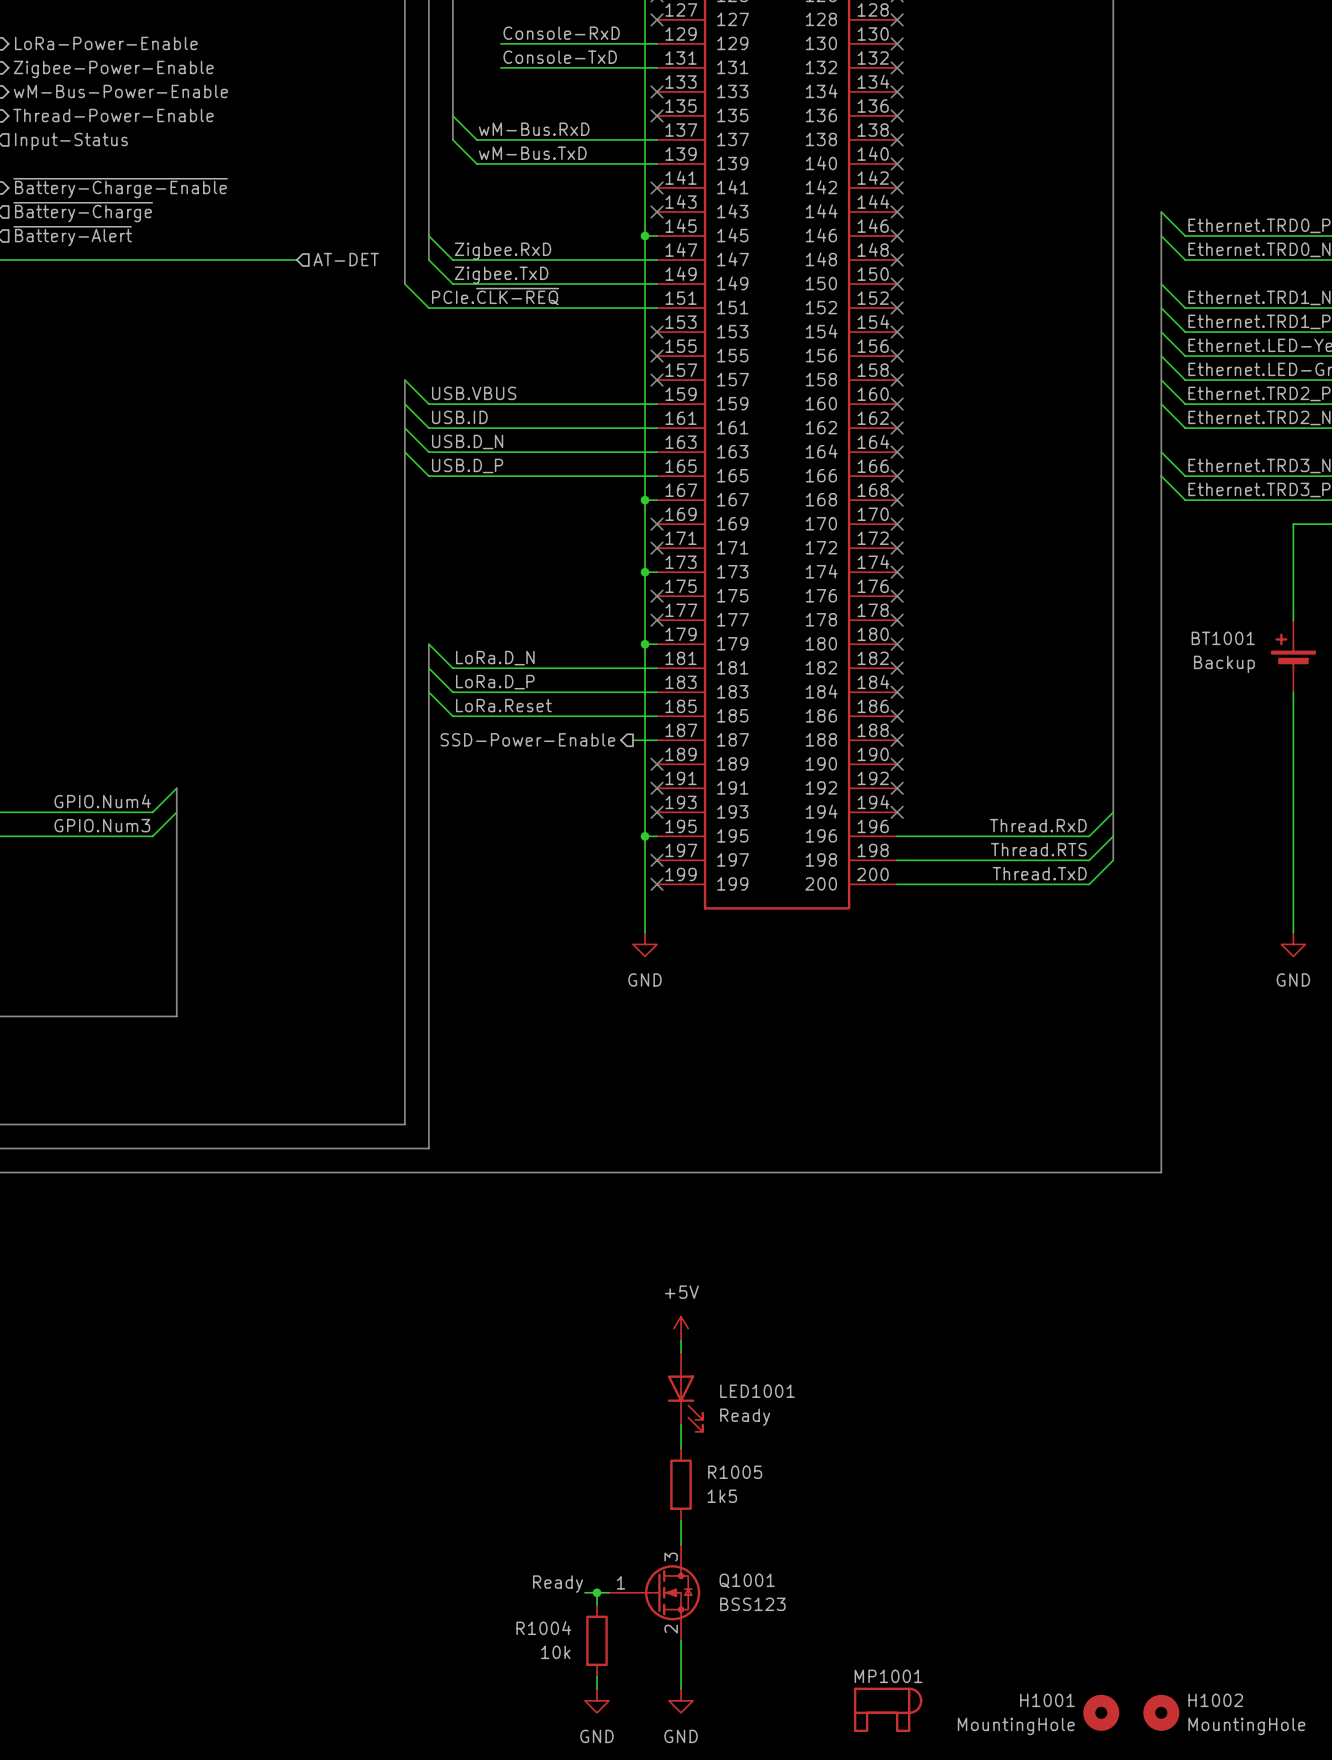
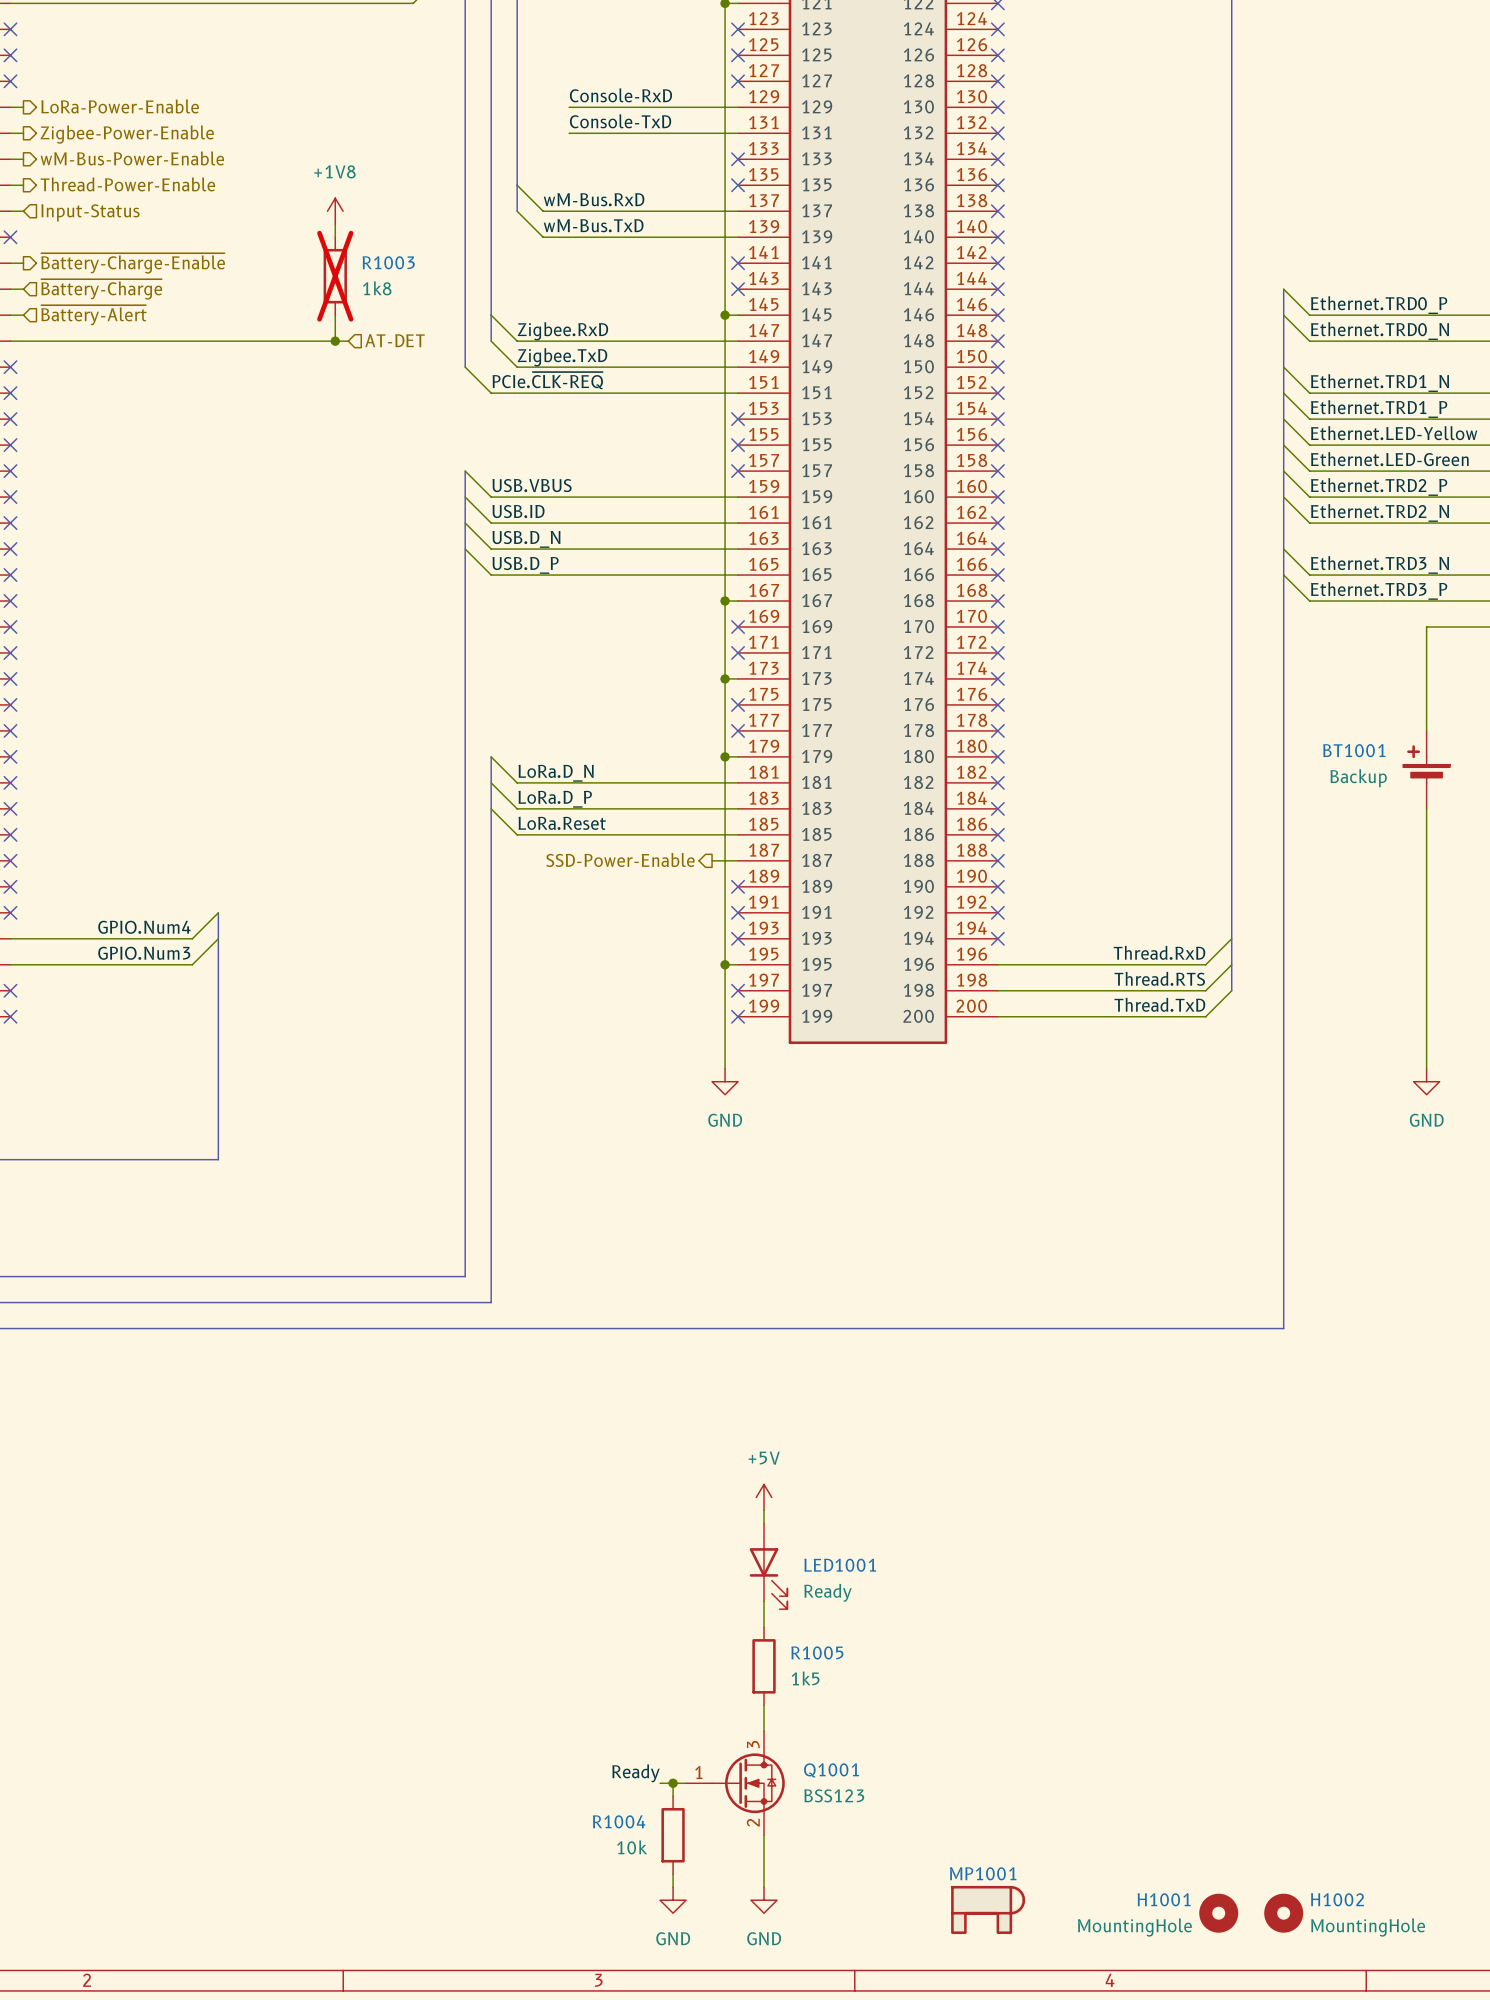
power symbol: none -> +1V8 (335, 211)
wire: none -> (335, 224) (335, 237)
R1003: none -> 1k8 (335, 276)
wire: none -> (335, 315) (335, 341)
junction: none -> (335, 341)

